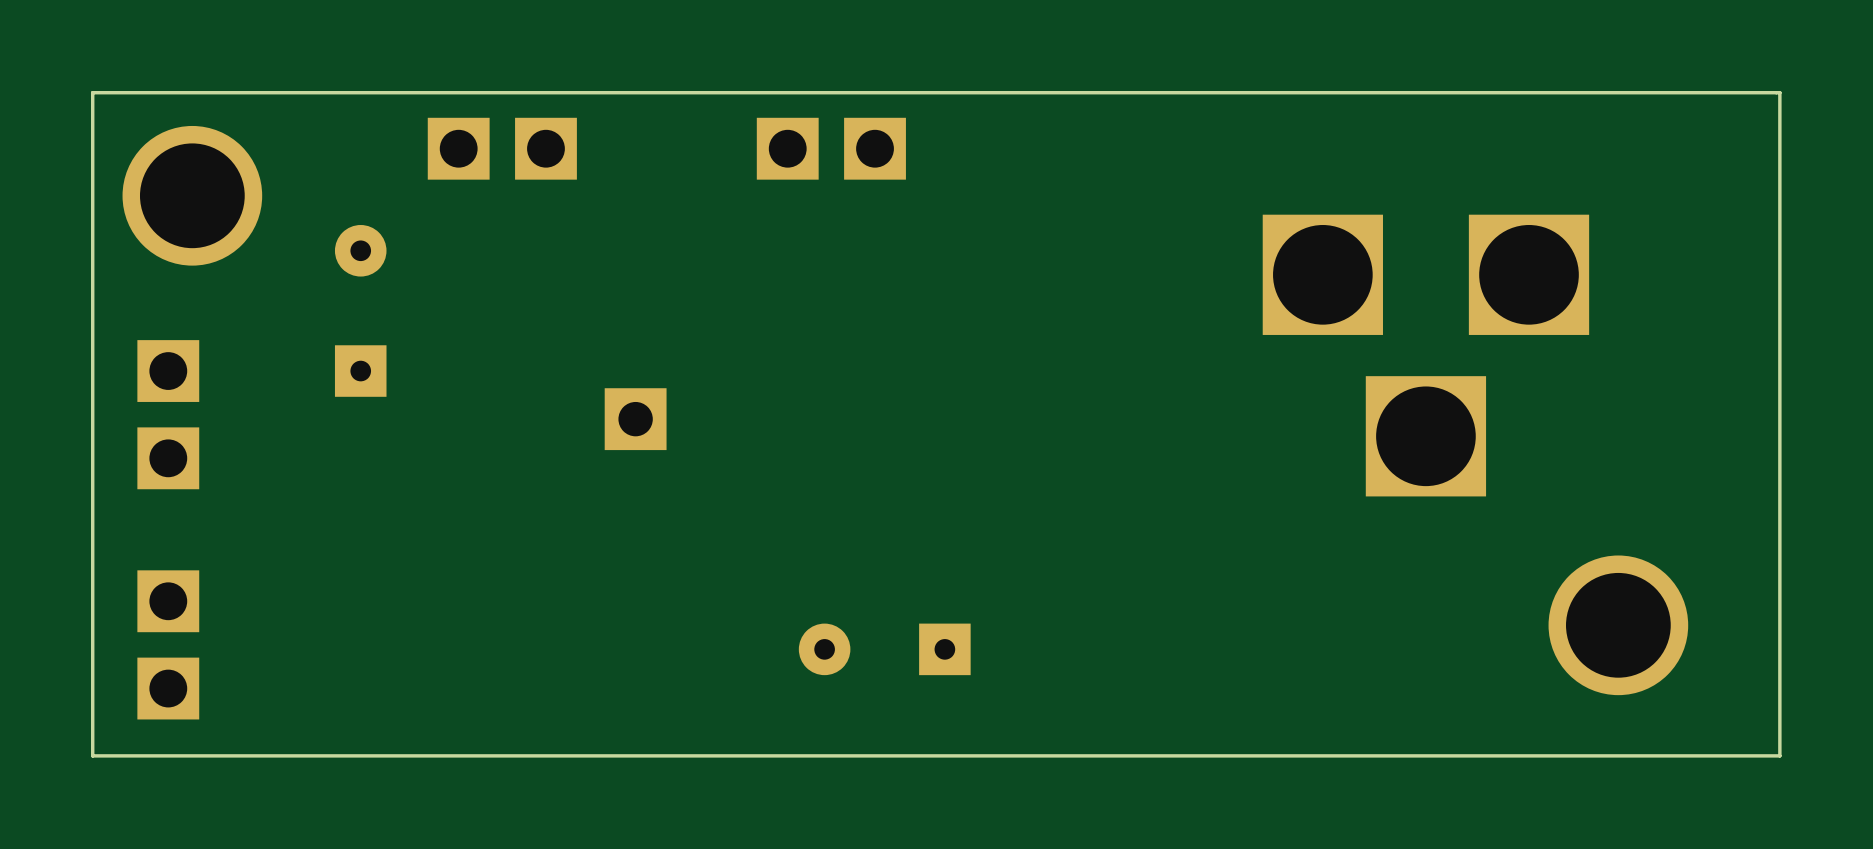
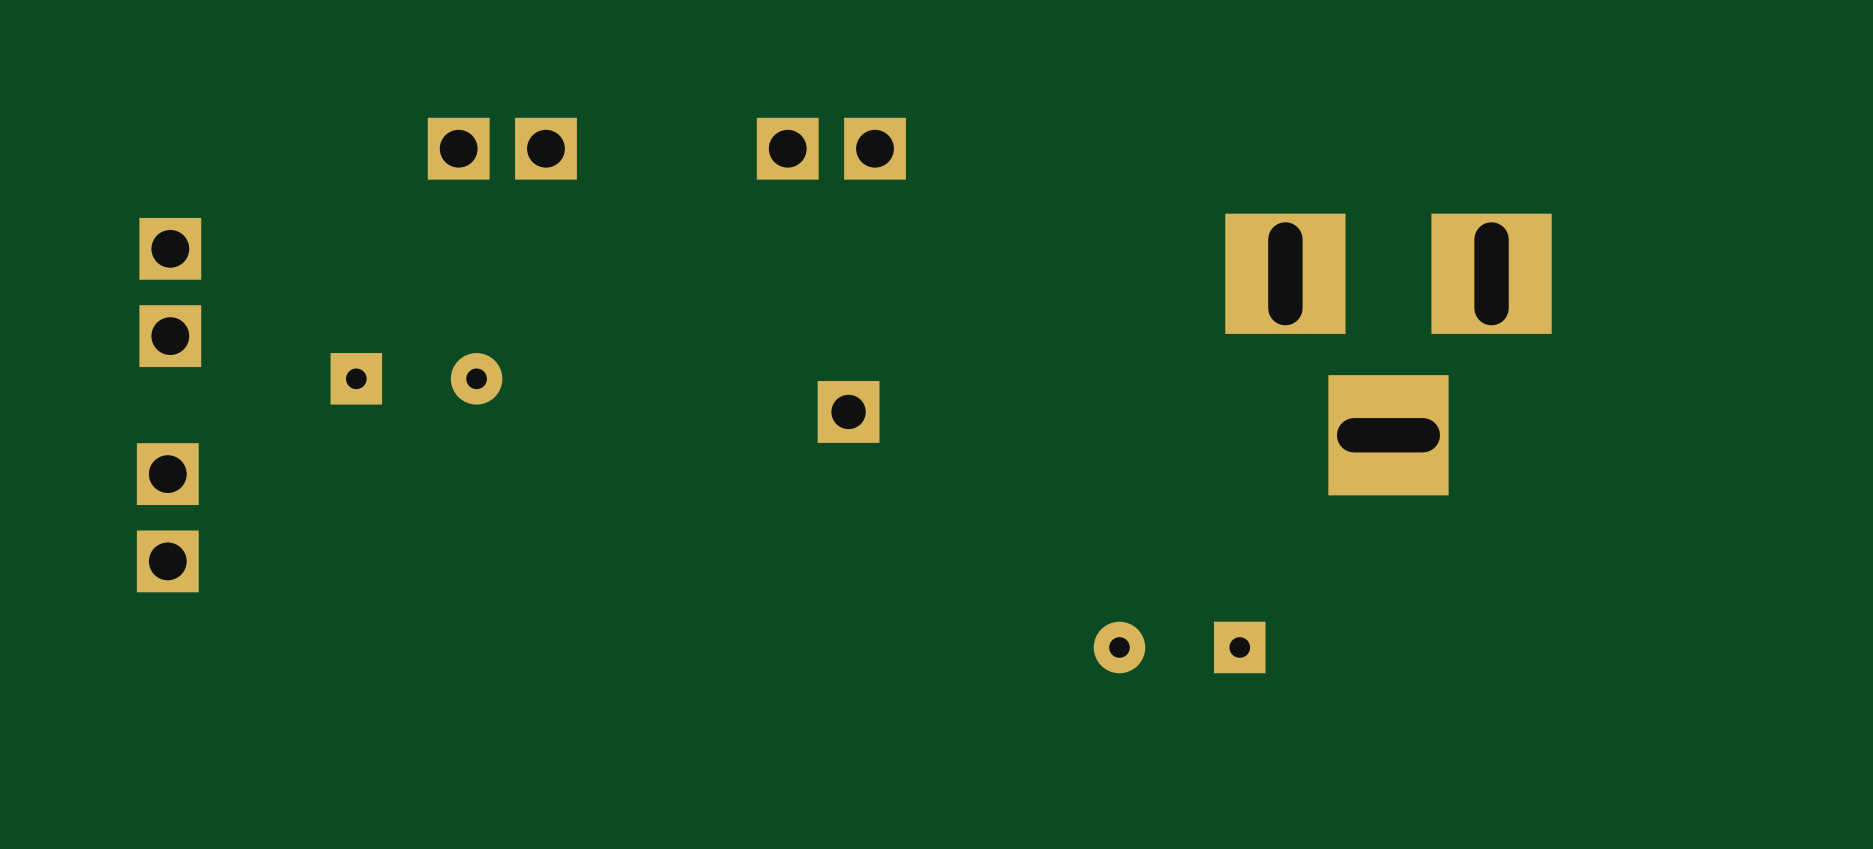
board edge: (1779, 92) (92, 92) (92, 755) (1779, 755) (1779, 92) -> none
part: (192, 195) -> none
part: none -> (170, 292)
part rotation: 0° (360, 310) -> 90° clockwise (416, 378)
part: none -> (1388, 354)
part: (1425, 355) -> none
part: (168, 414) -> none
part position: (635, 419) -> (848, 411)
part: none -> (167, 517)
part: (1618, 625) -> none
part: (168, 644) -> none
part: none -> (1179, 647)
part: (884, 649) -> none

